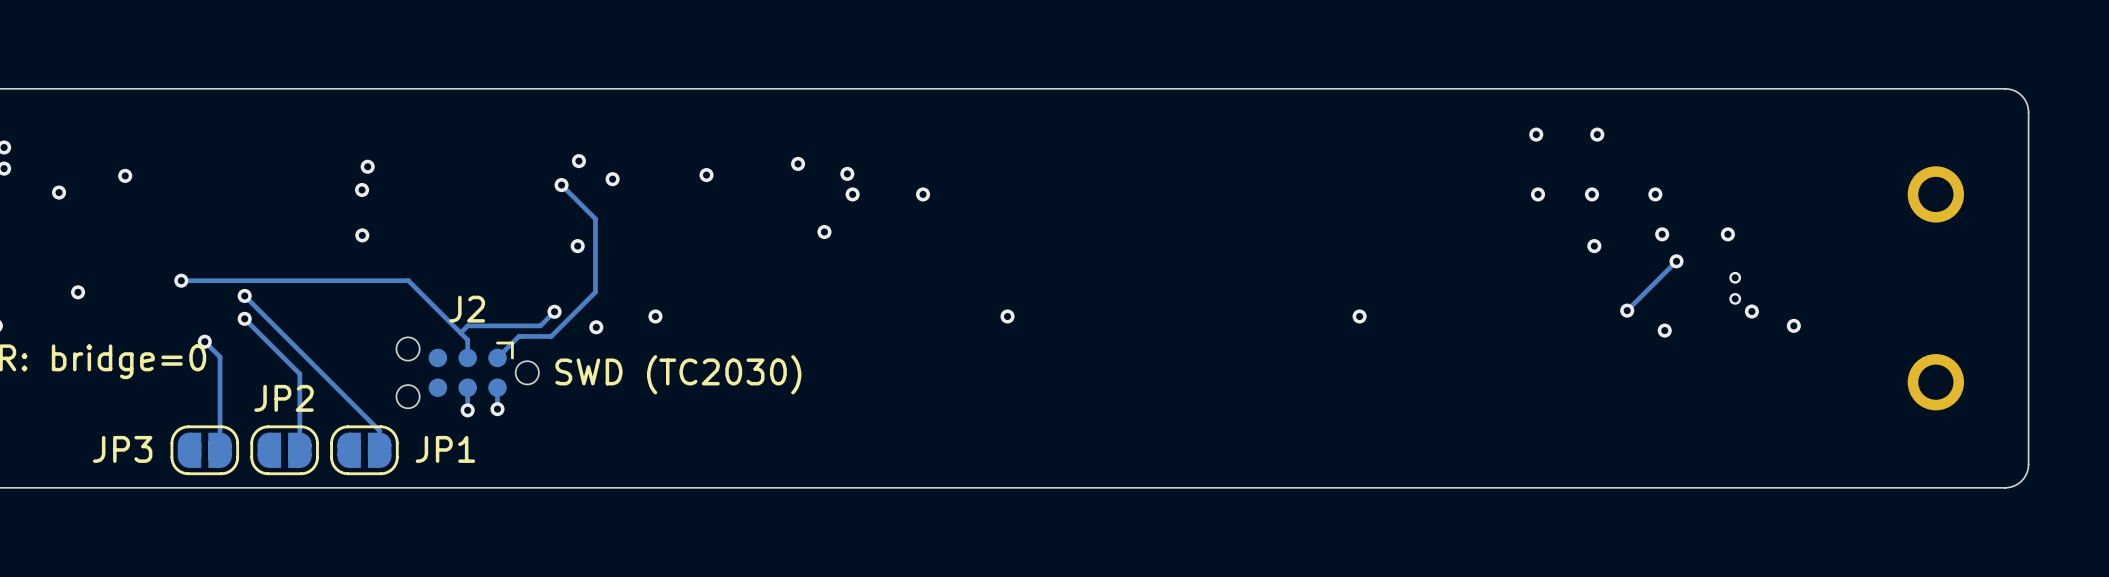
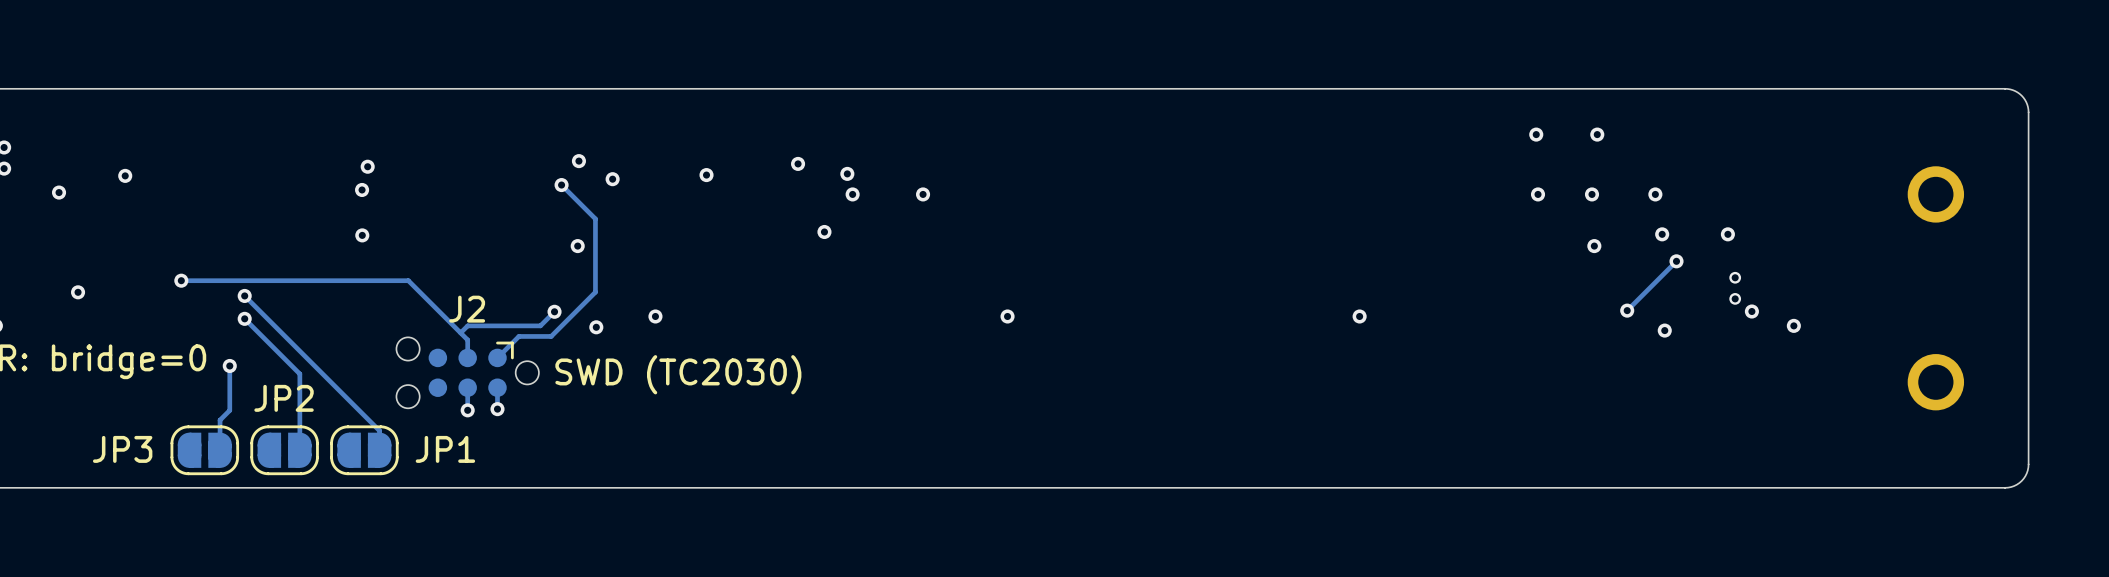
track: (204, 341) (220, 356) (220, 420) -> (229, 365) (229, 410) (220, 420)
via position: (204, 341) -> (229, 365)

